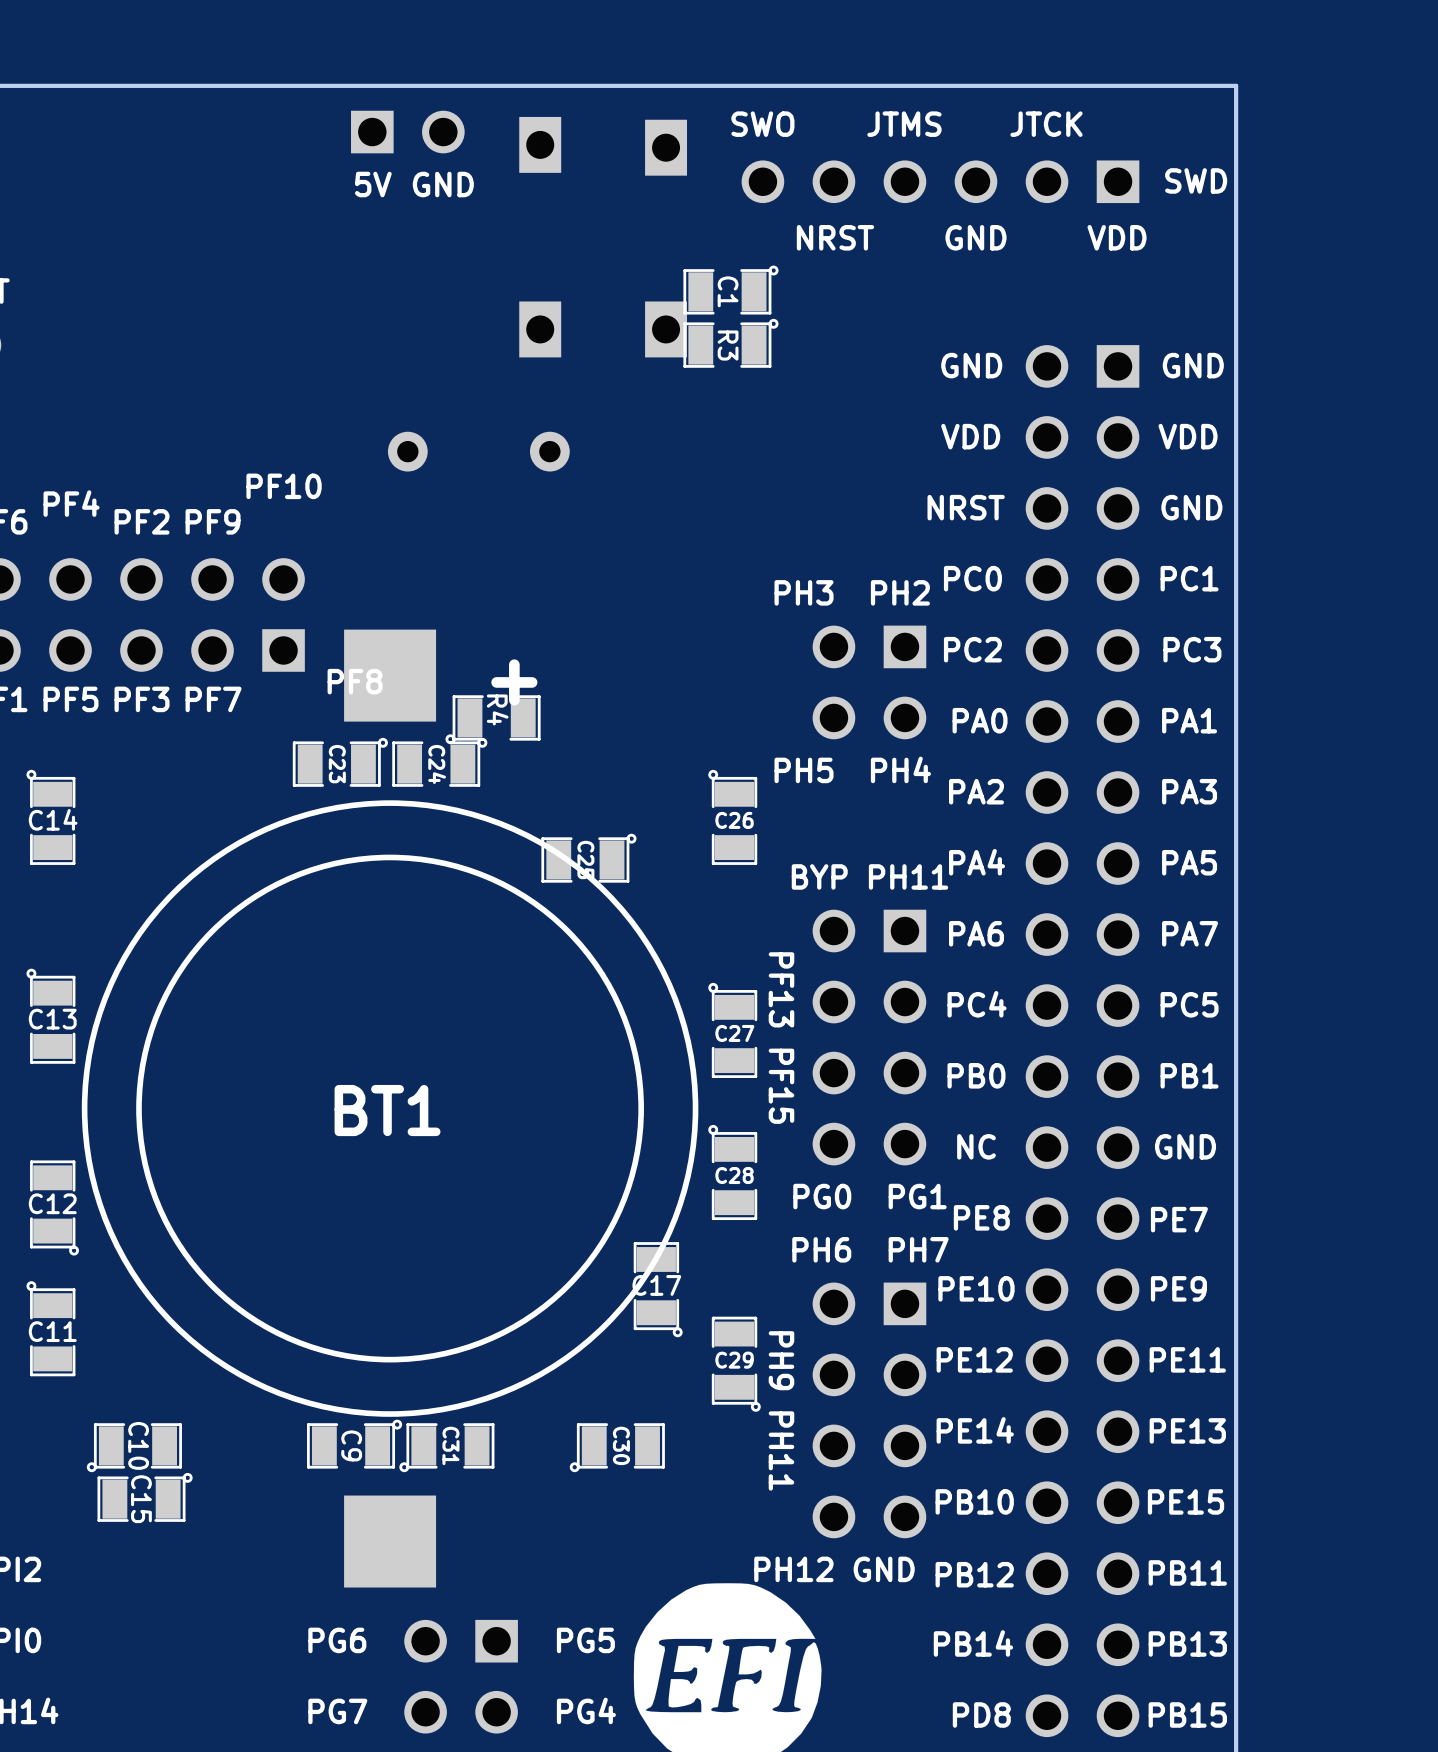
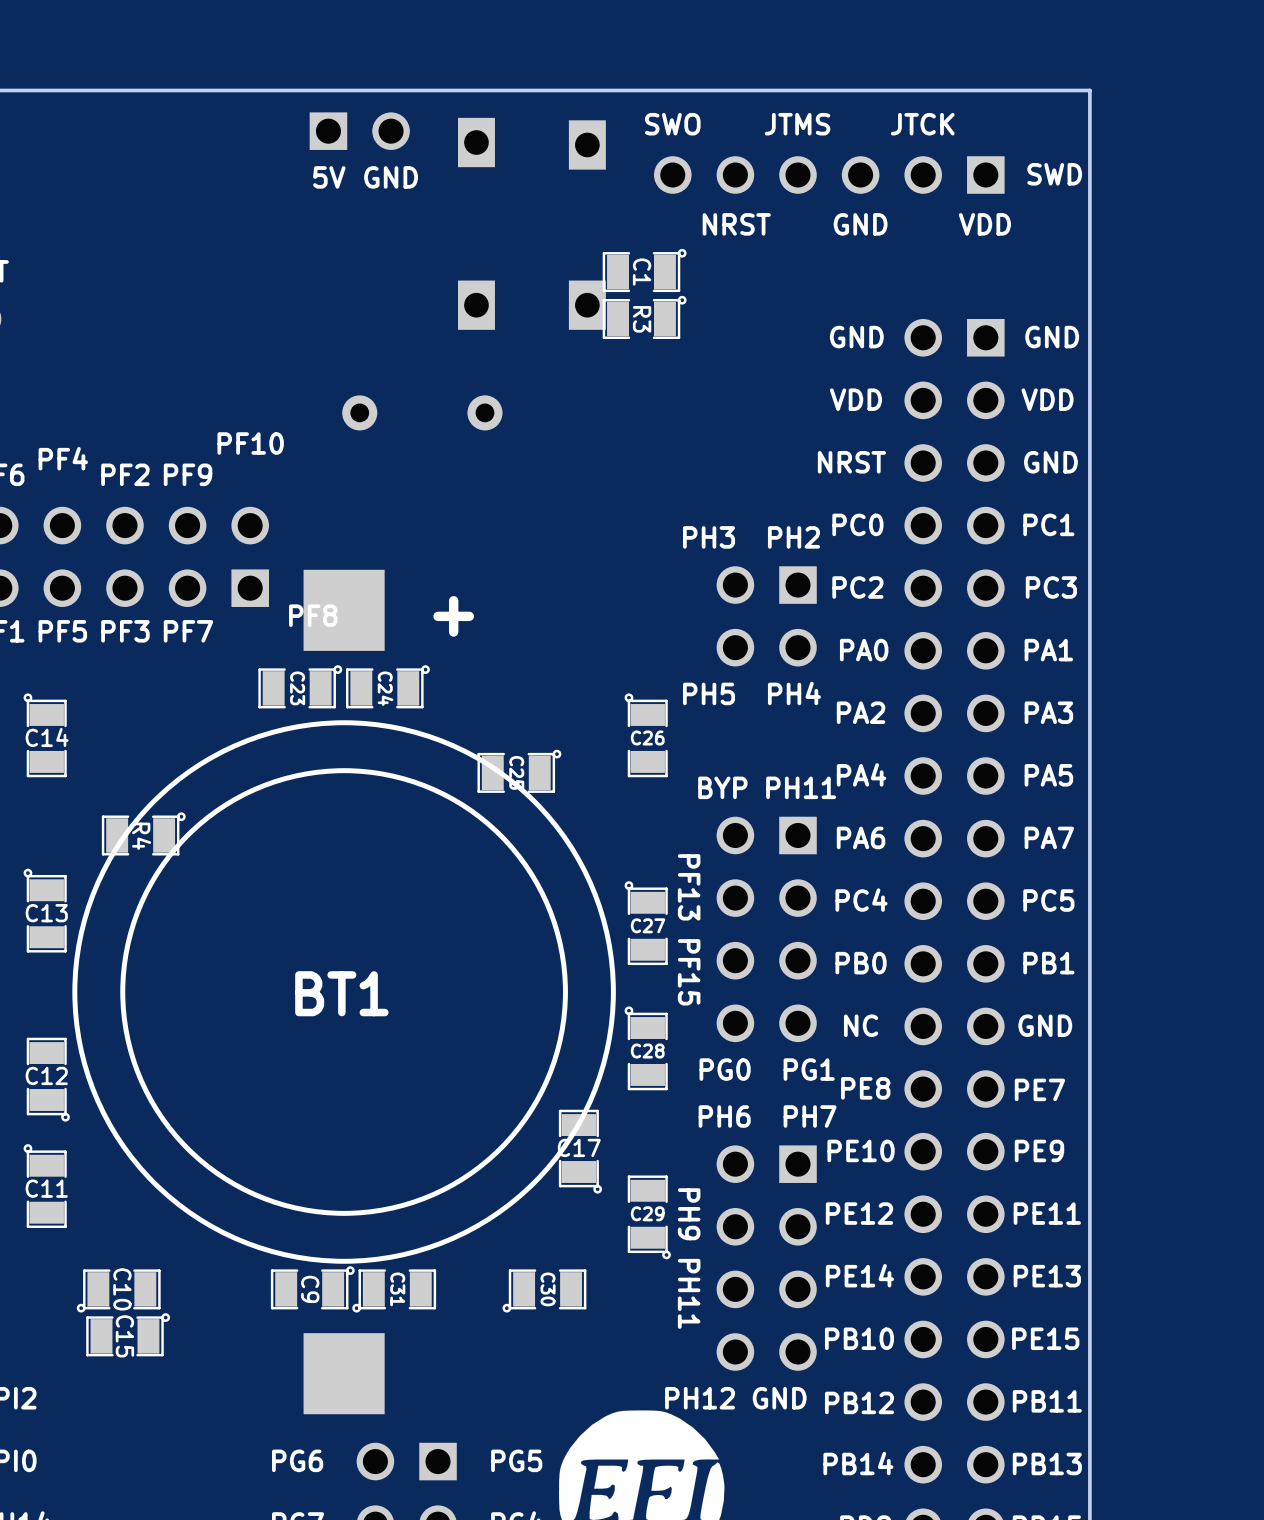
R4 rotation: 0° (493, 719) -> 180° (143, 833)
R4 position: (493, 719) -> (143, 833)

